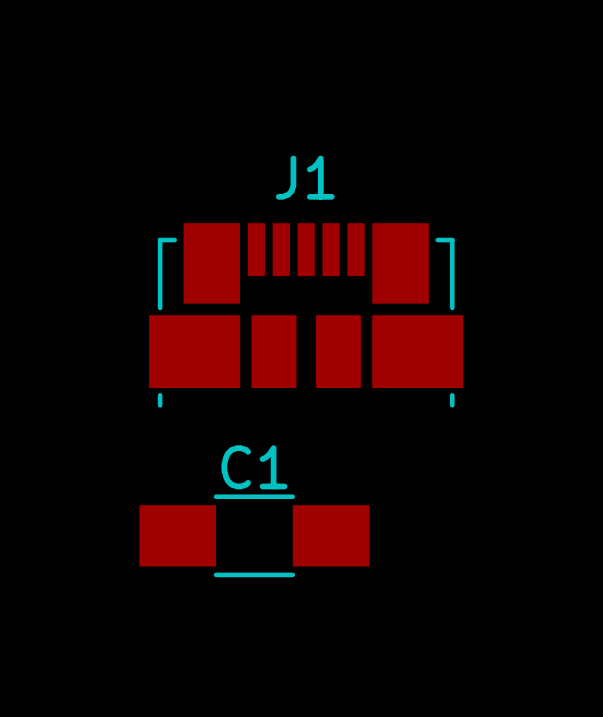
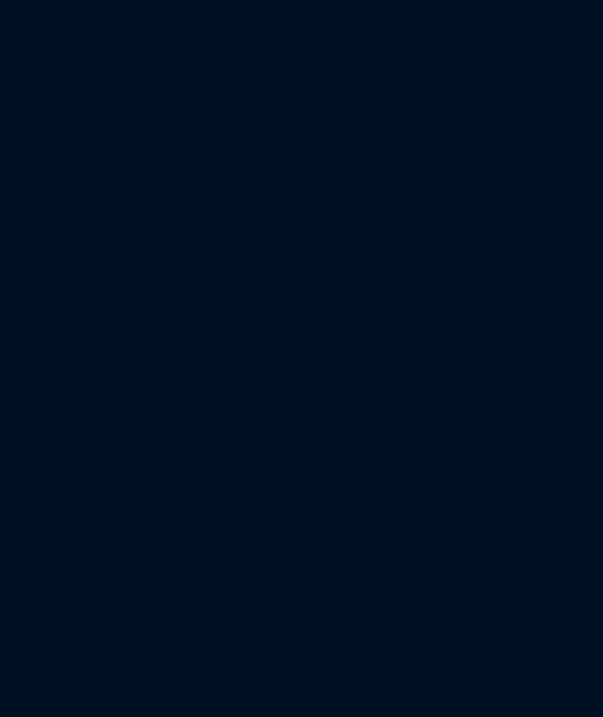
J1: (306, 315) -> none
C1: (254, 535) -> none

